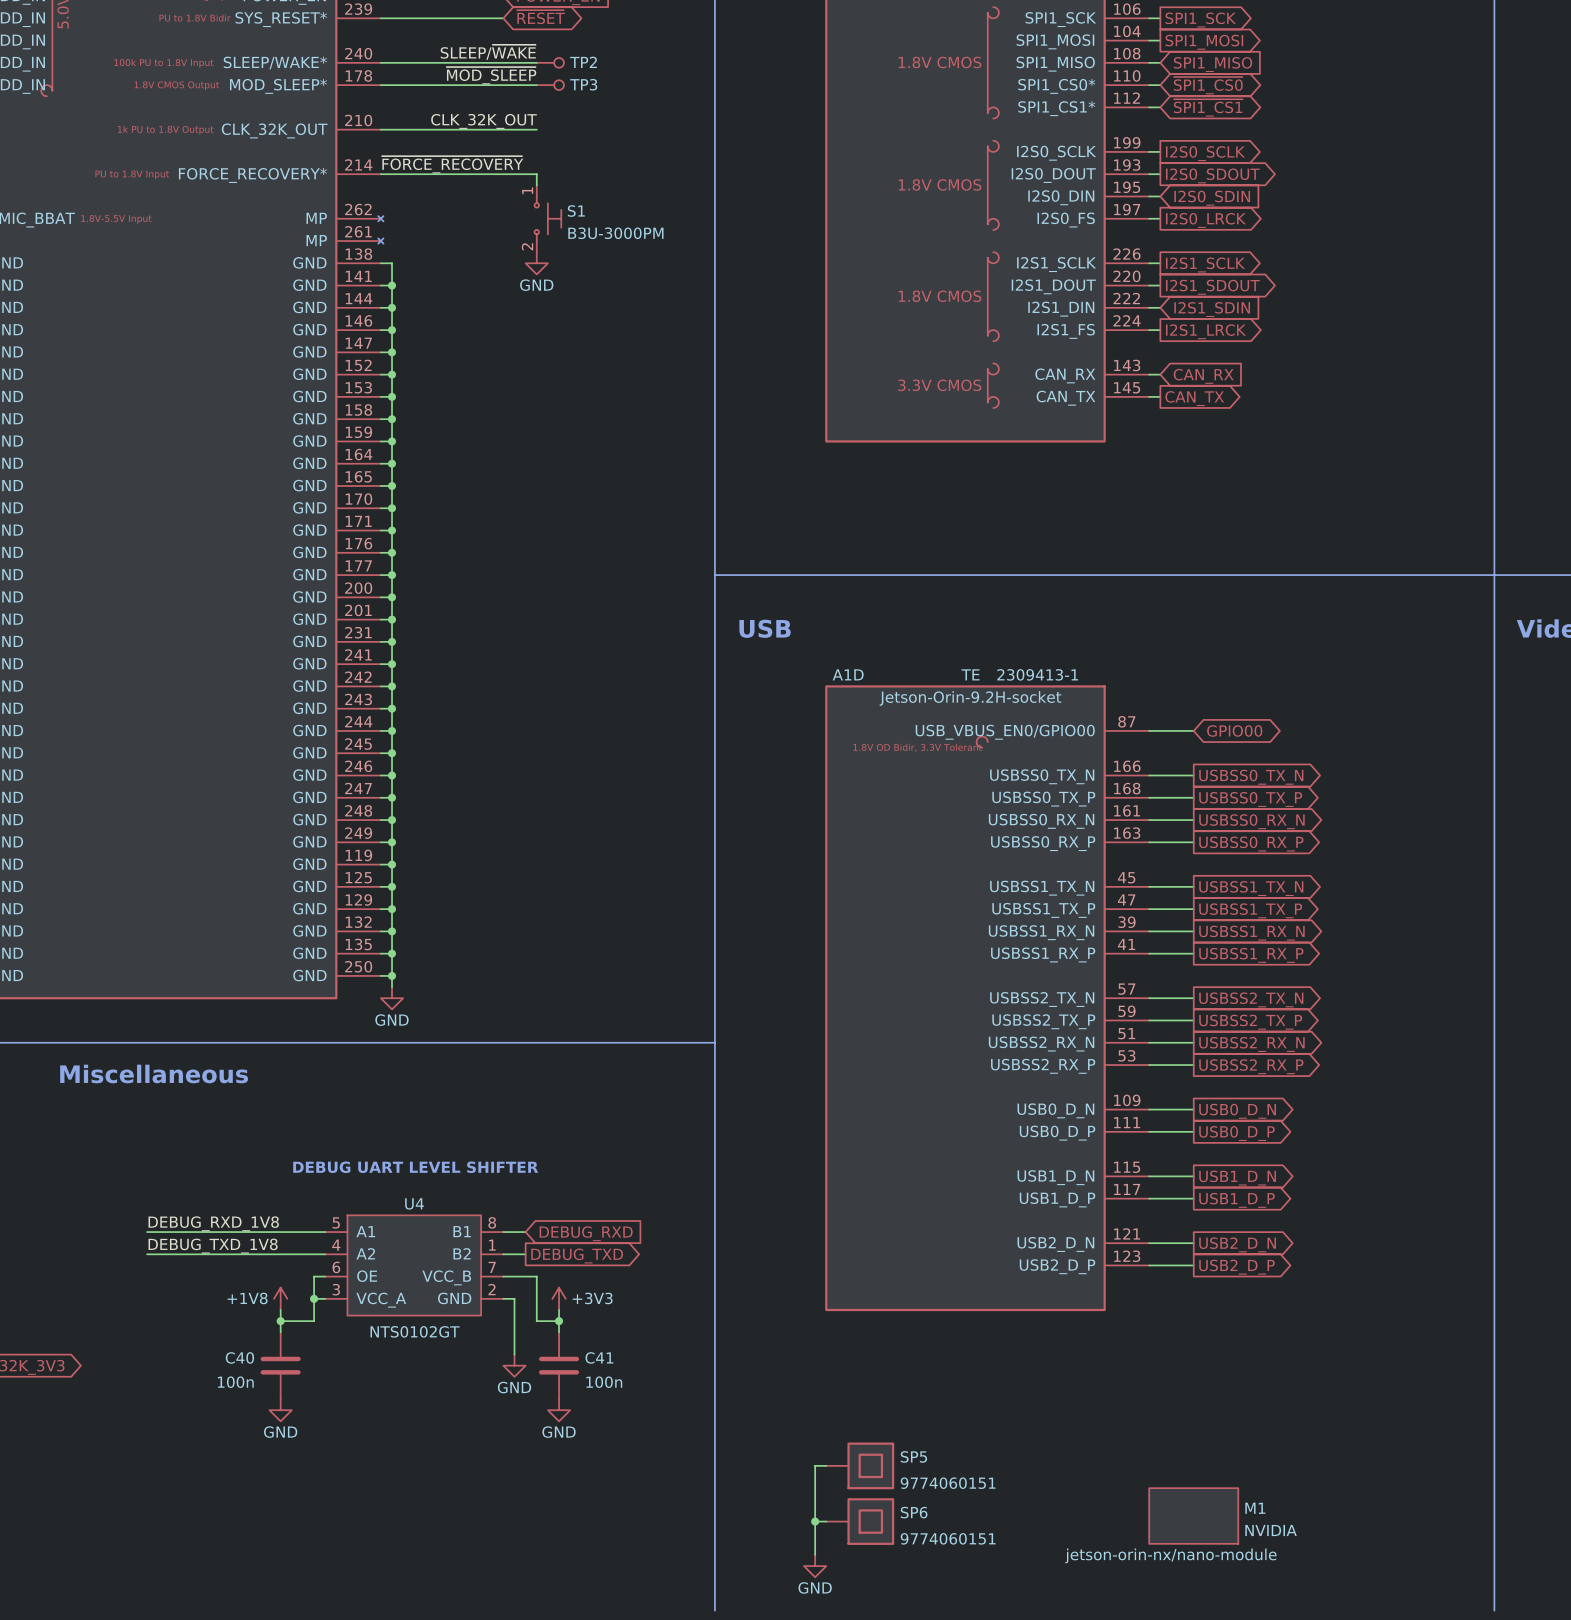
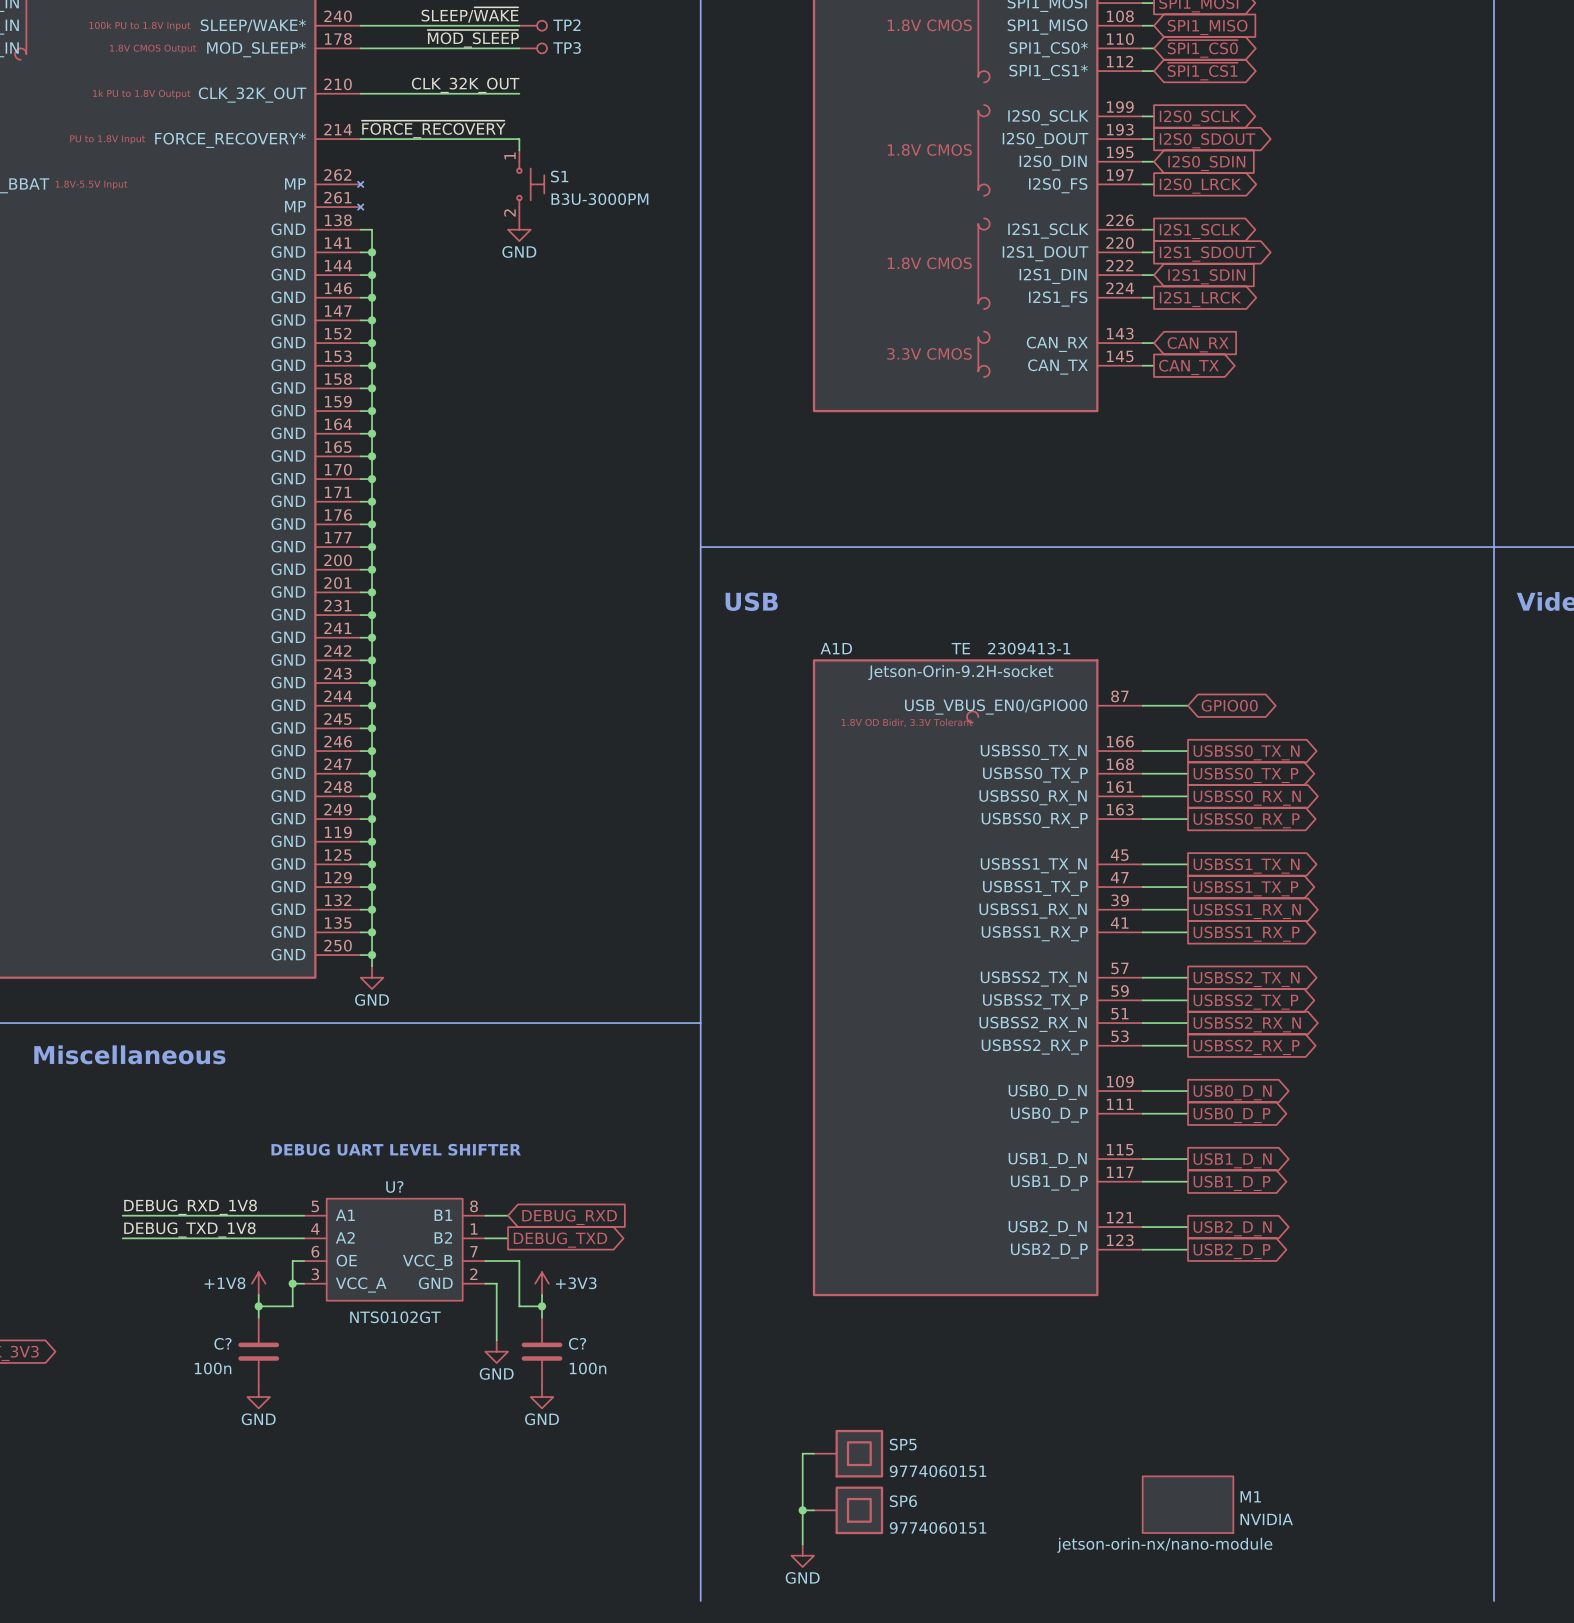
U4 name: U4 (414, 1203) -> U? (394, 1186)
C40 name: C40 (239, 1357) -> C? (222, 1343)
C41 name: C41 (599, 1357) -> C? (577, 1343)

